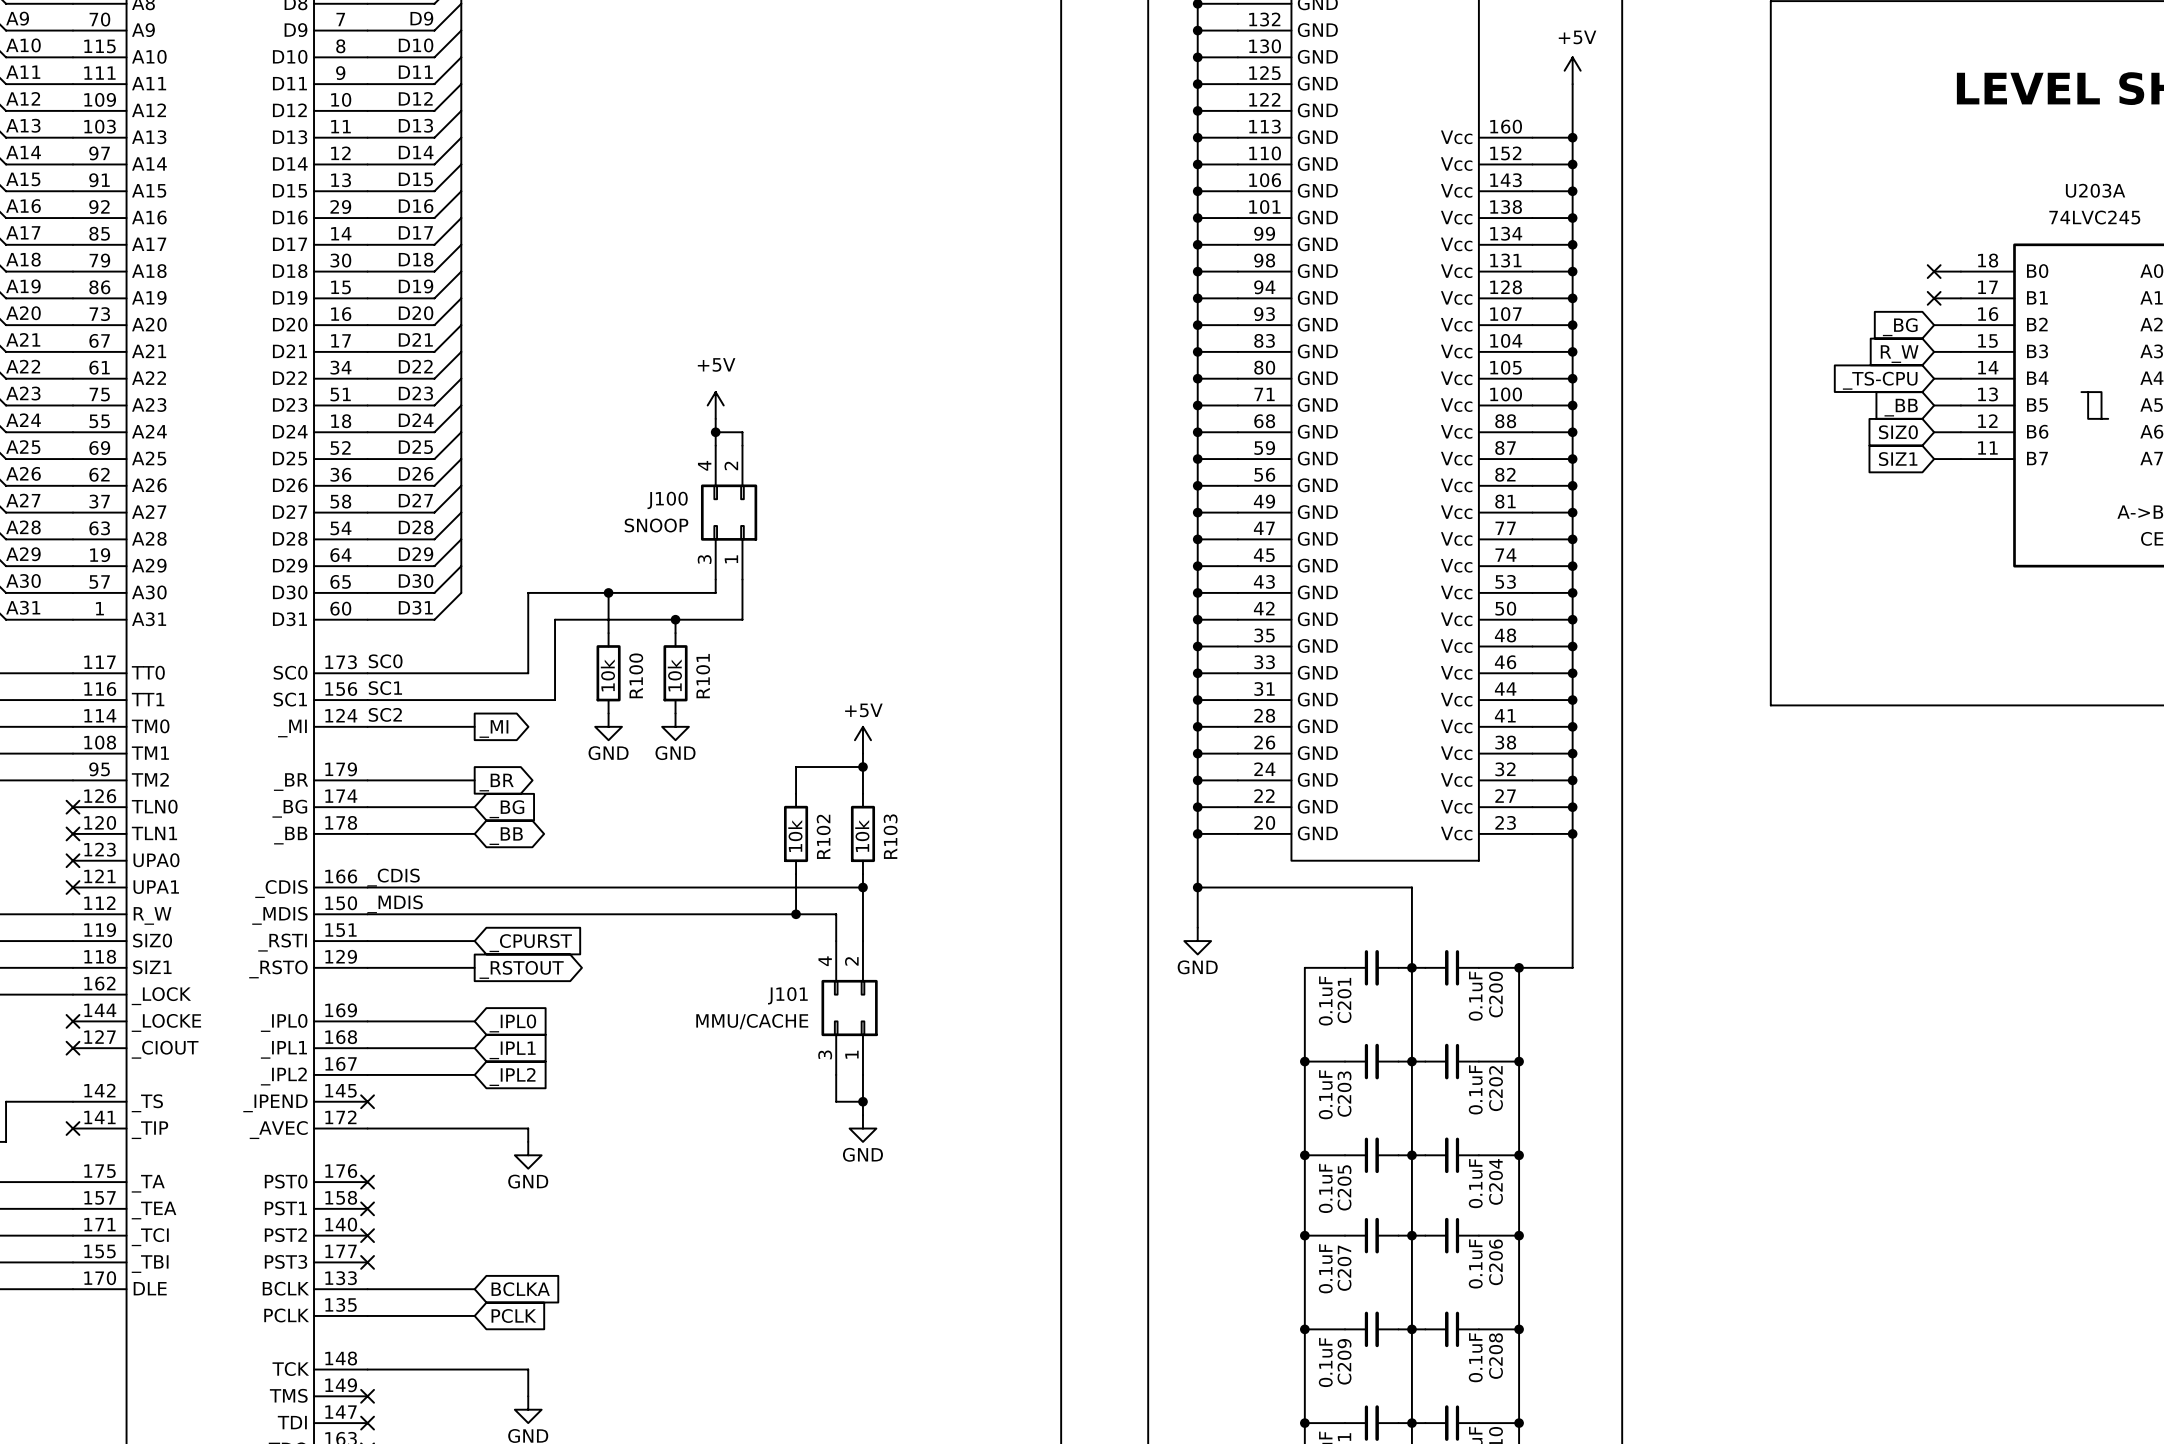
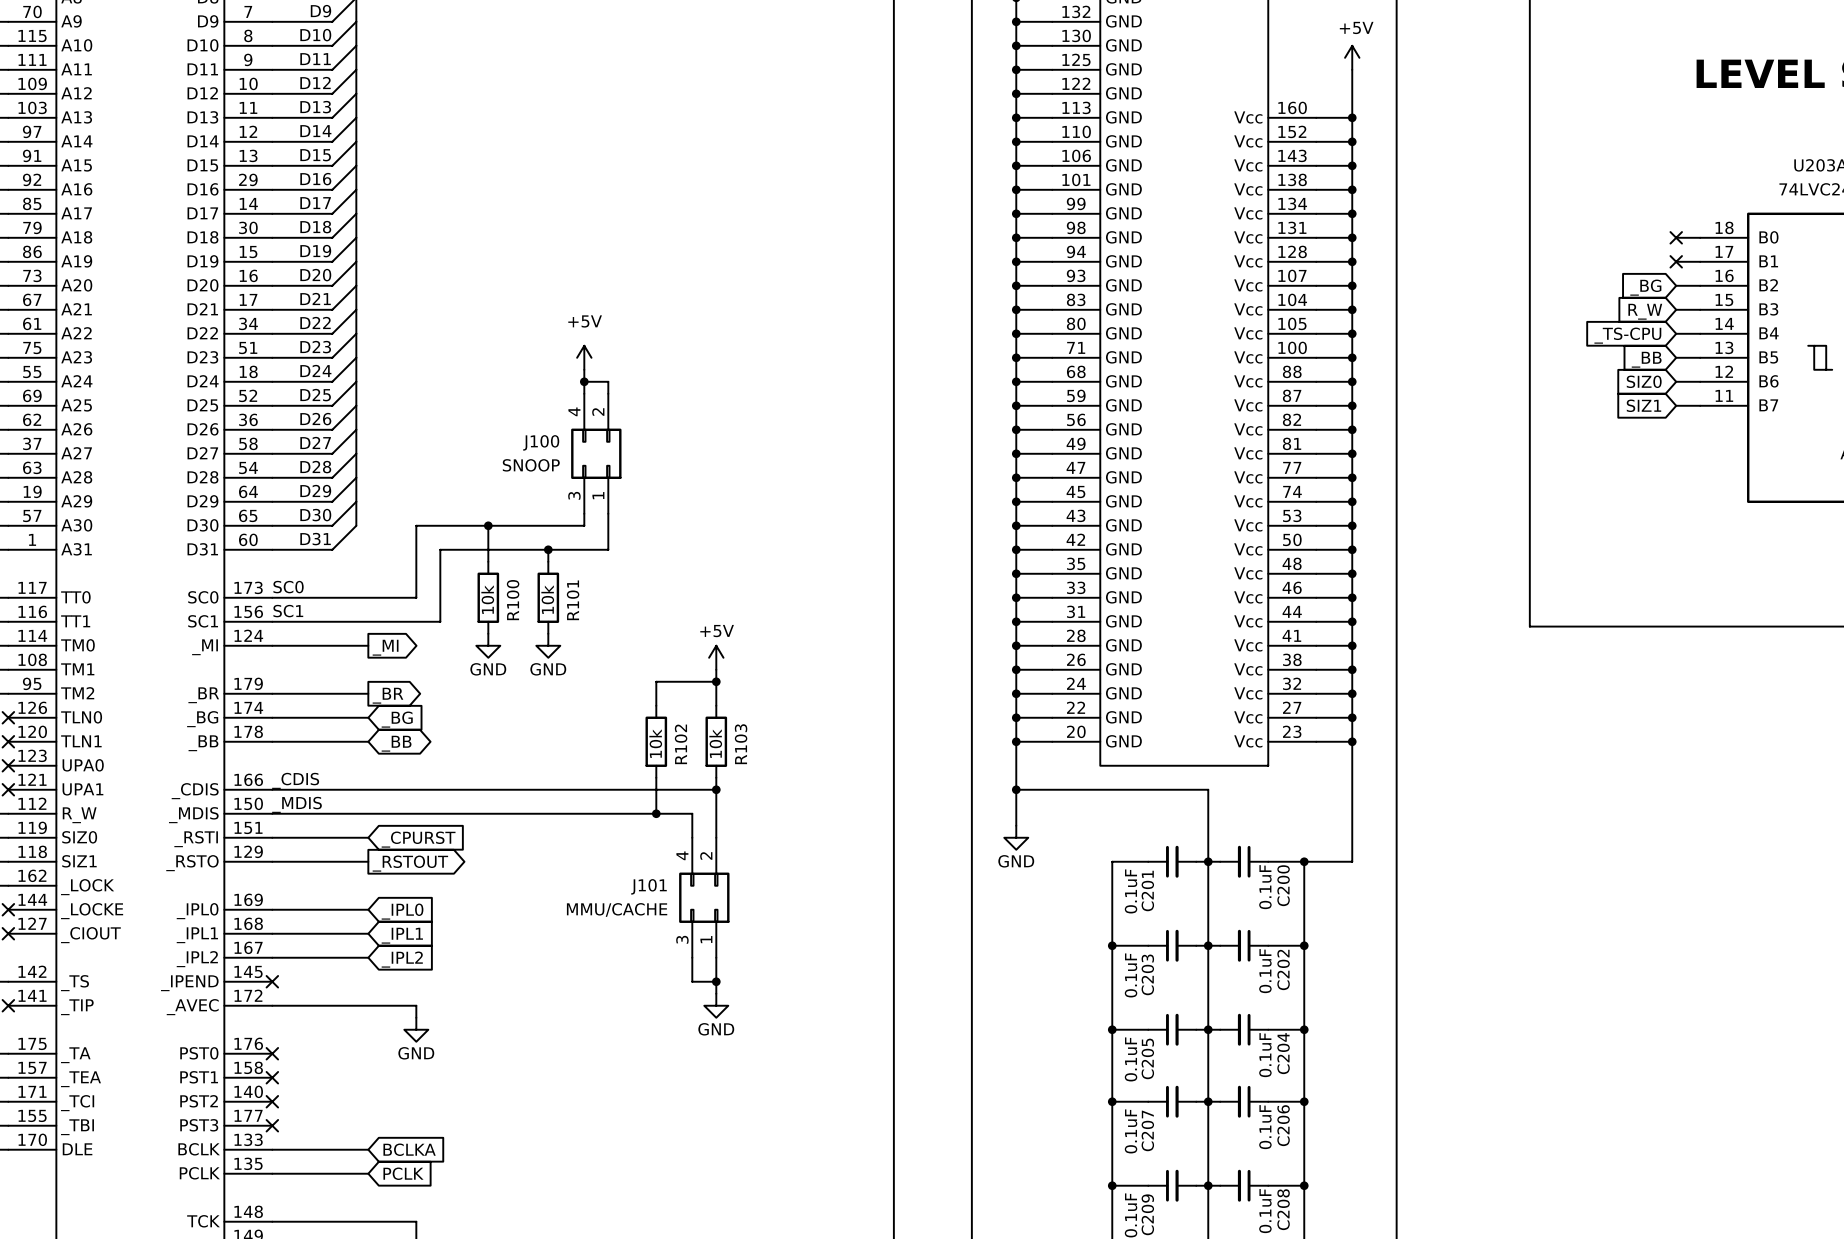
label: SC2 (385, 714) -> none

